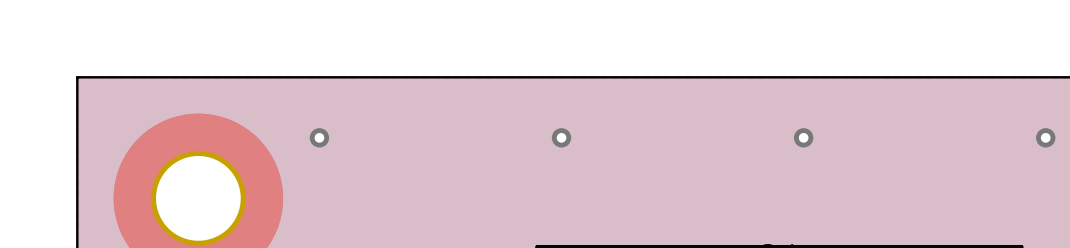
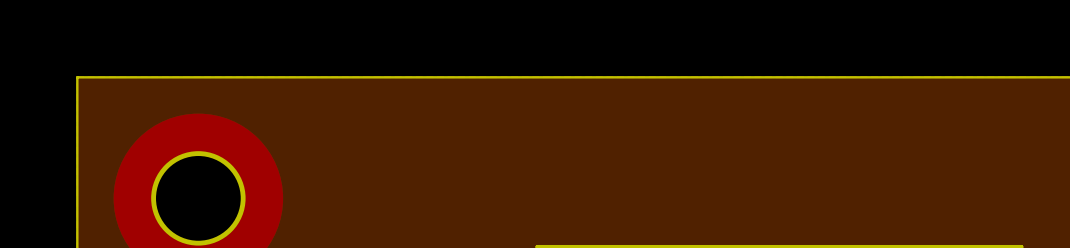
via: (319, 137) -> none
via: (561, 137) -> none
via: (803, 137) -> none
via: (1045, 137) -> none

